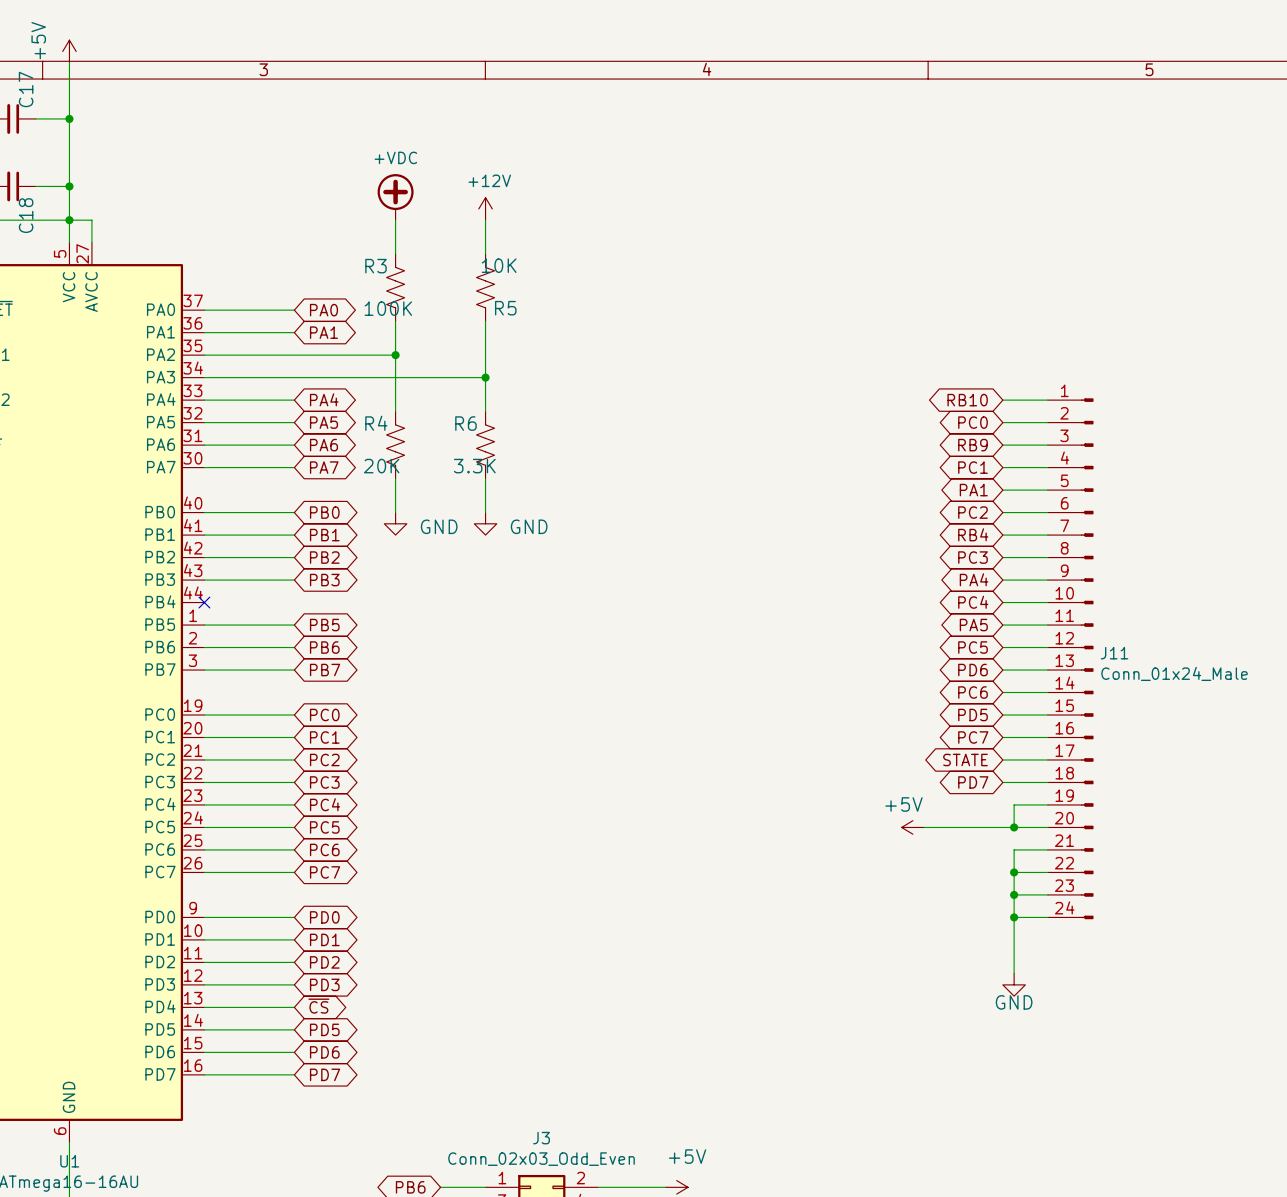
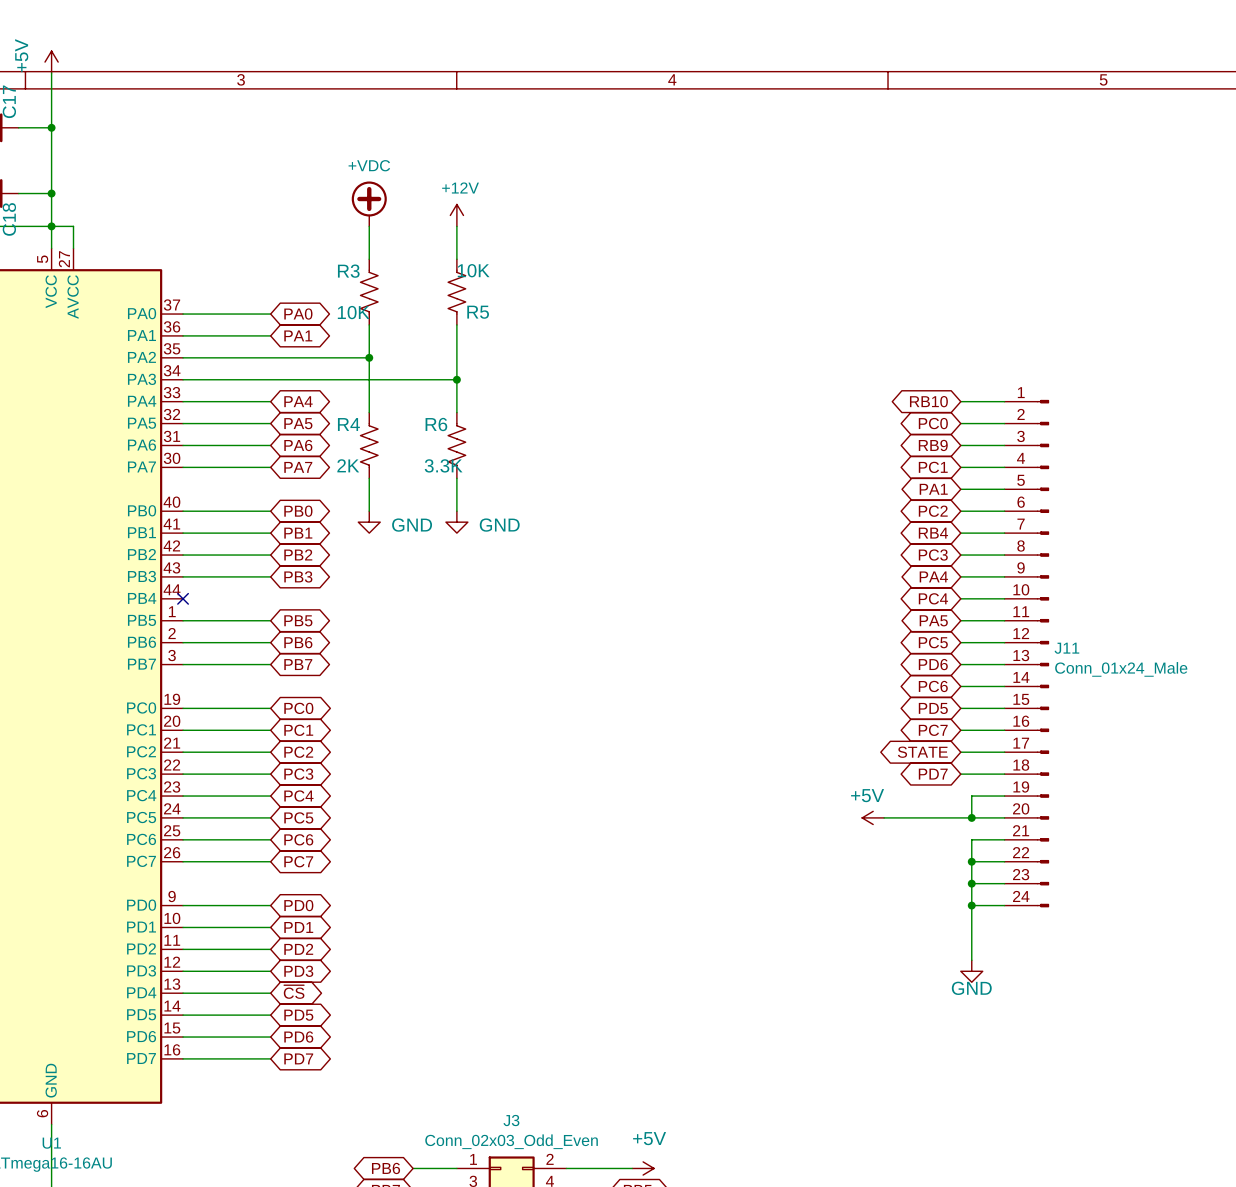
R3 value: 100K (388, 308) -> 10K (353, 312)
R4 value: 20K (381, 466) -> 2K (348, 465)

